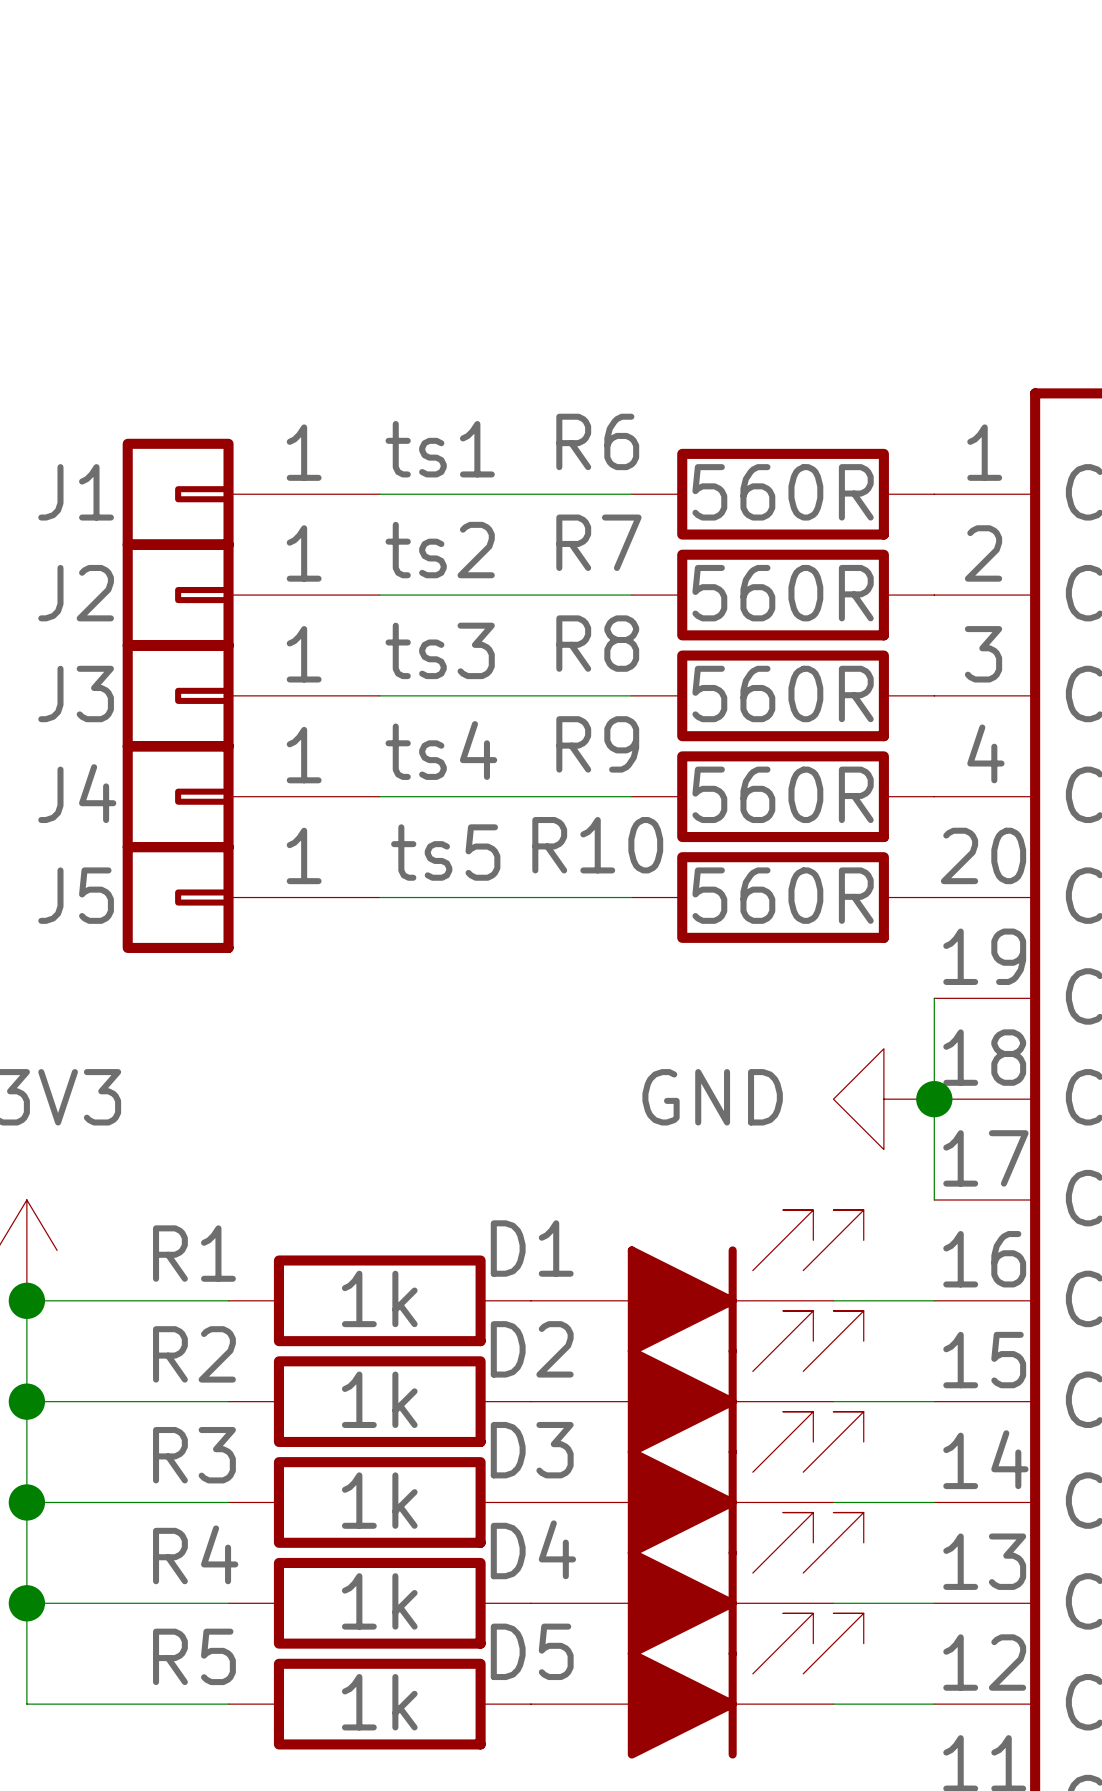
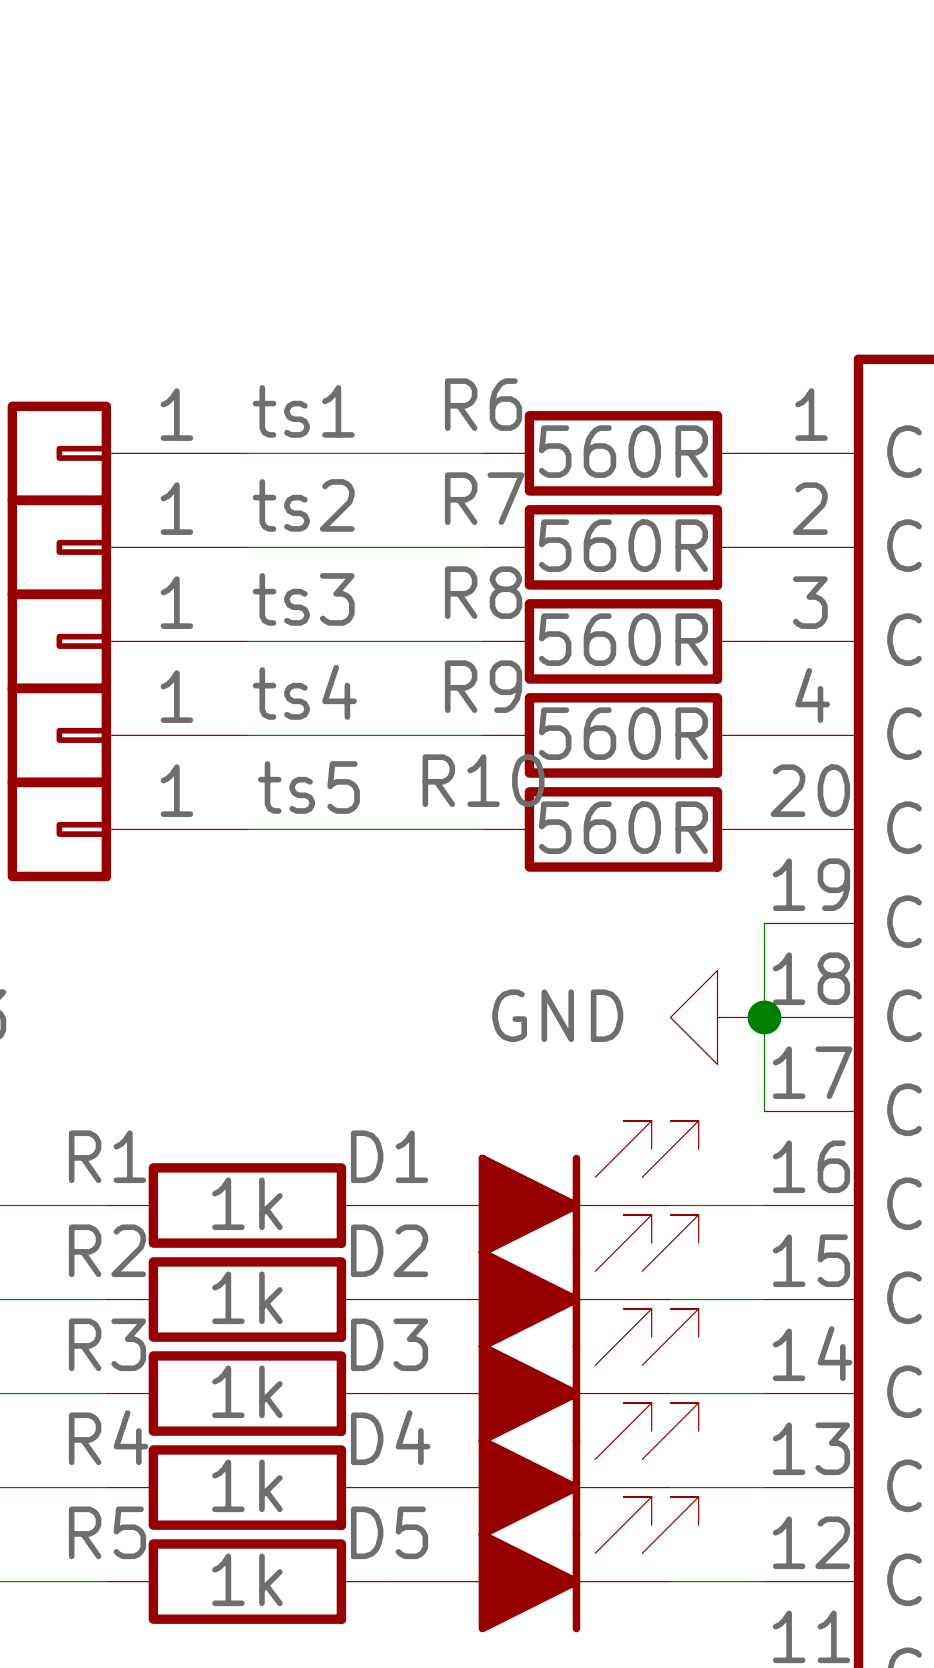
R6 name position: R6 (597, 441) -> R6 (483, 404)
R7 name position: R7 (598, 542) -> R7 (484, 498)
R8 name position: R8 (597, 643) -> R8 (483, 592)
R9 name position: R9 (597, 744) -> R9 (483, 686)
R10 name position: R10 (597, 845) -> R10 (483, 780)
R1 name position: R1 (194, 1253) -> R1 (107, 1156)
R2 name position: R2 (194, 1354) -> R2 (107, 1250)
R3 name position: R3 (194, 1455) -> R3 (107, 1344)
R4 name position: R4 (195, 1554) -> R4 (108, 1437)
R5 name position: R5 (194, 1656) -> R5 (107, 1532)

